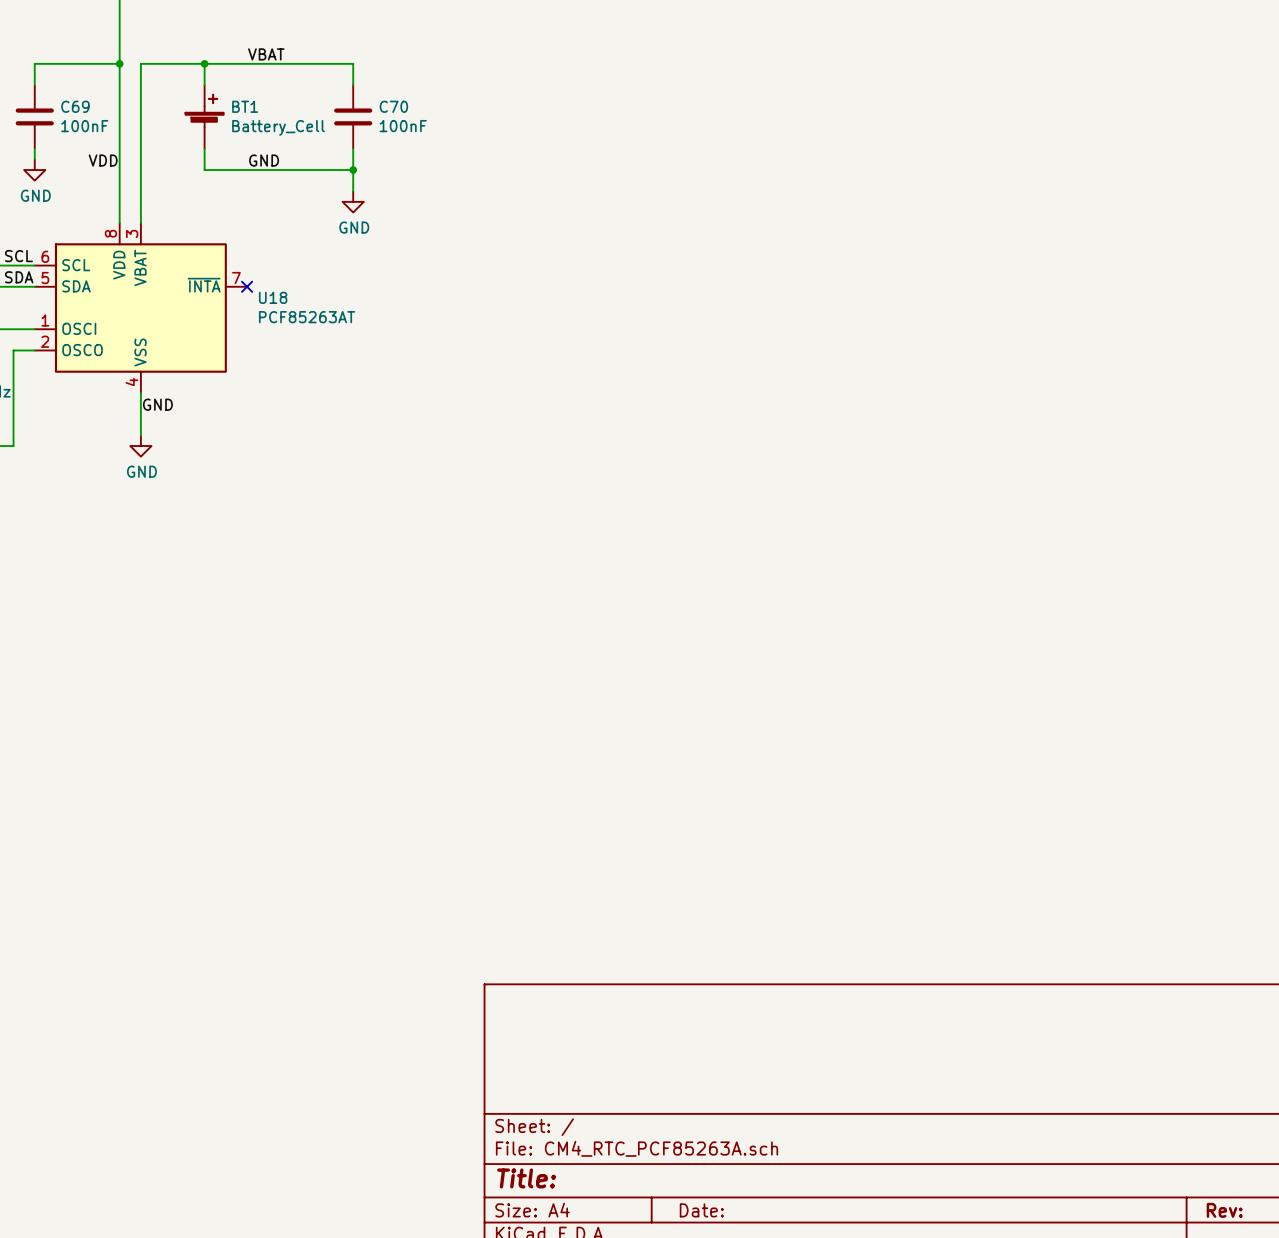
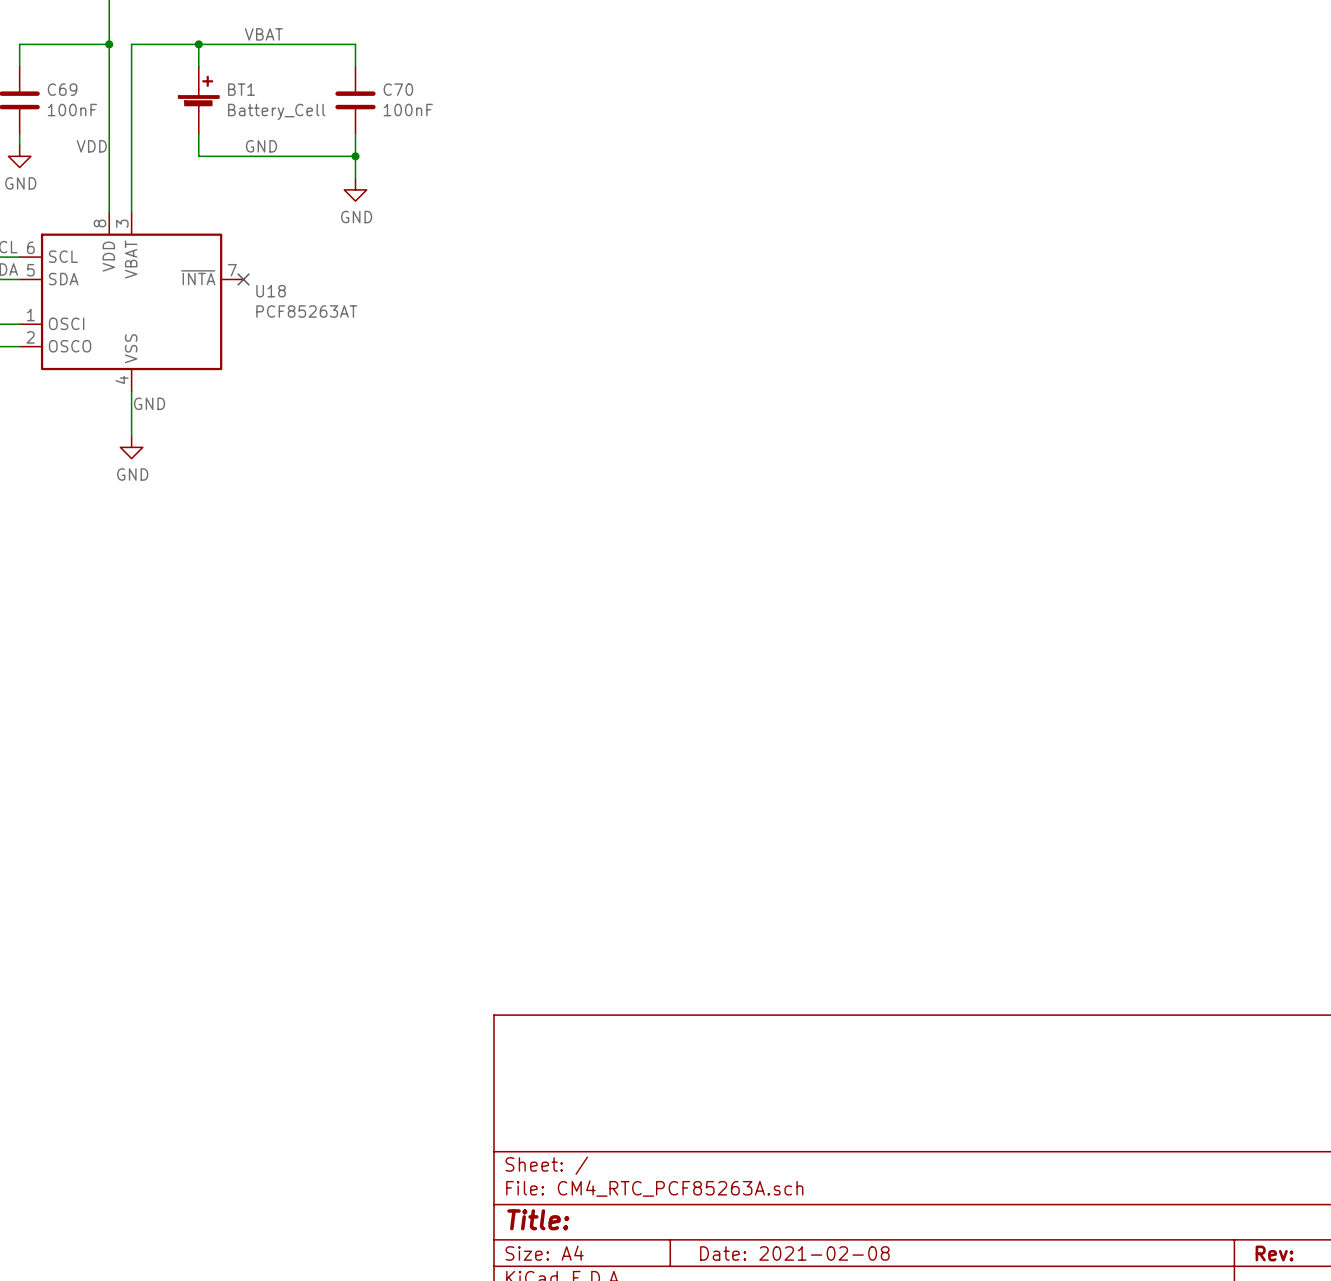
title block: Date: (701, 1210) -> Date: 2021-02-08 (794, 1253)

